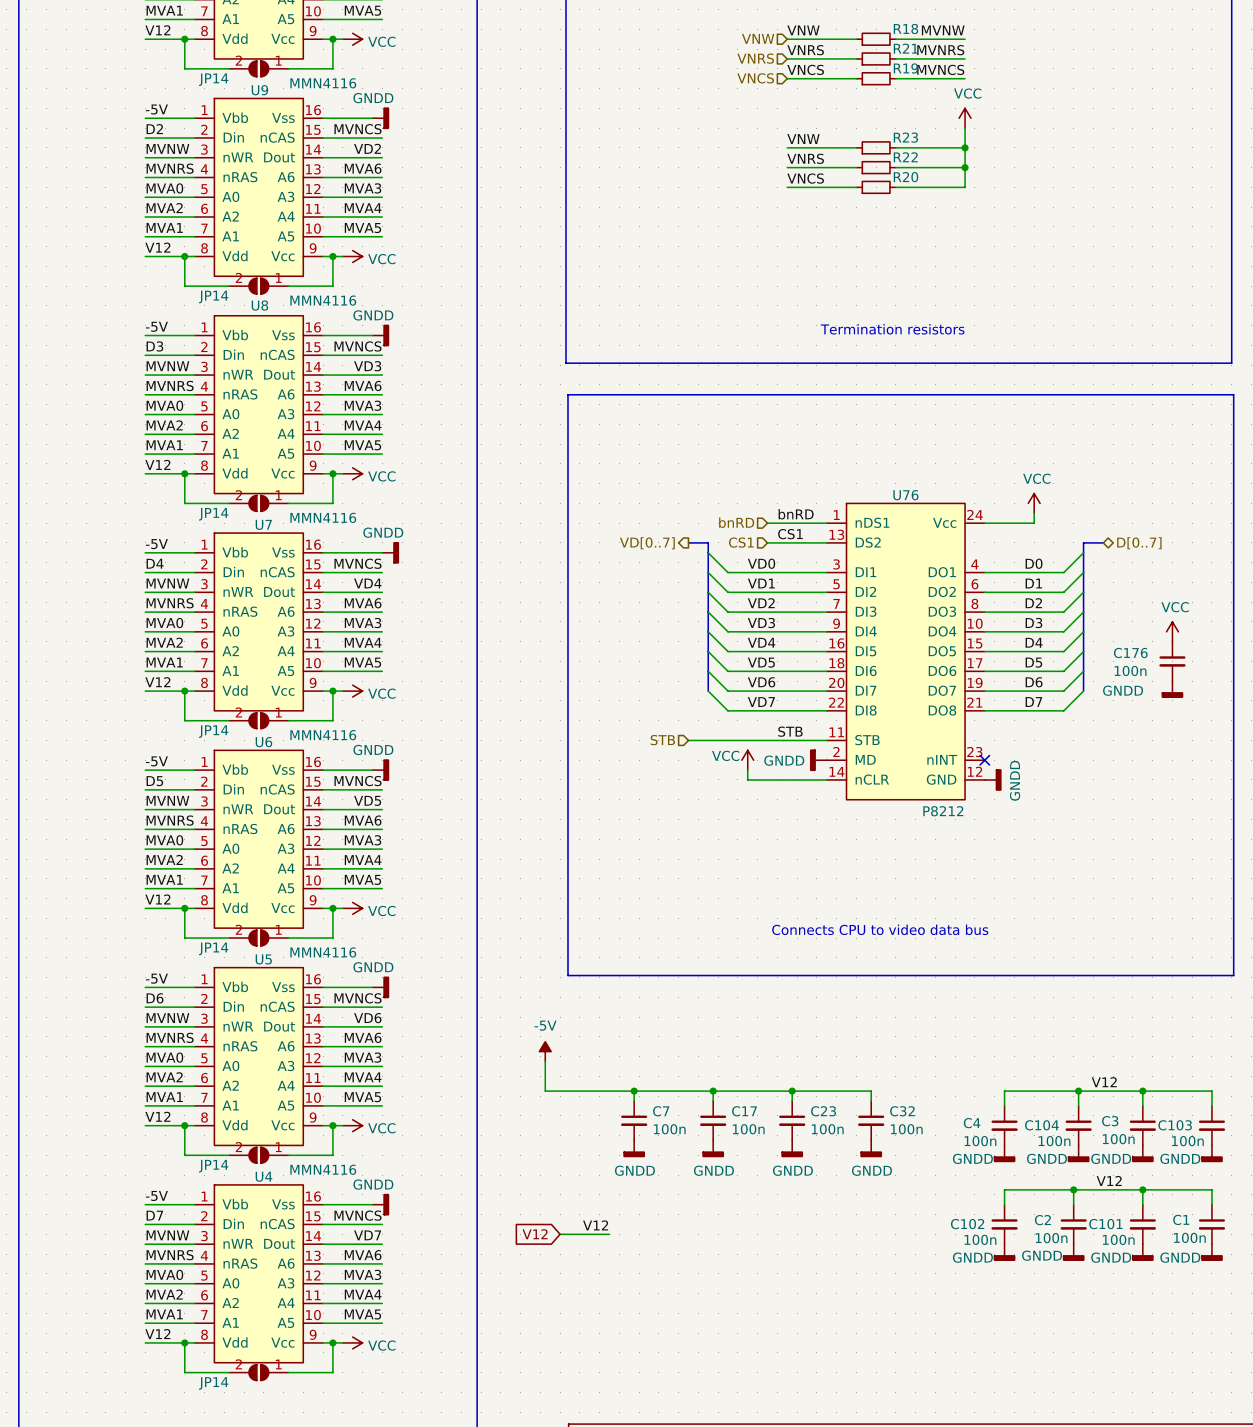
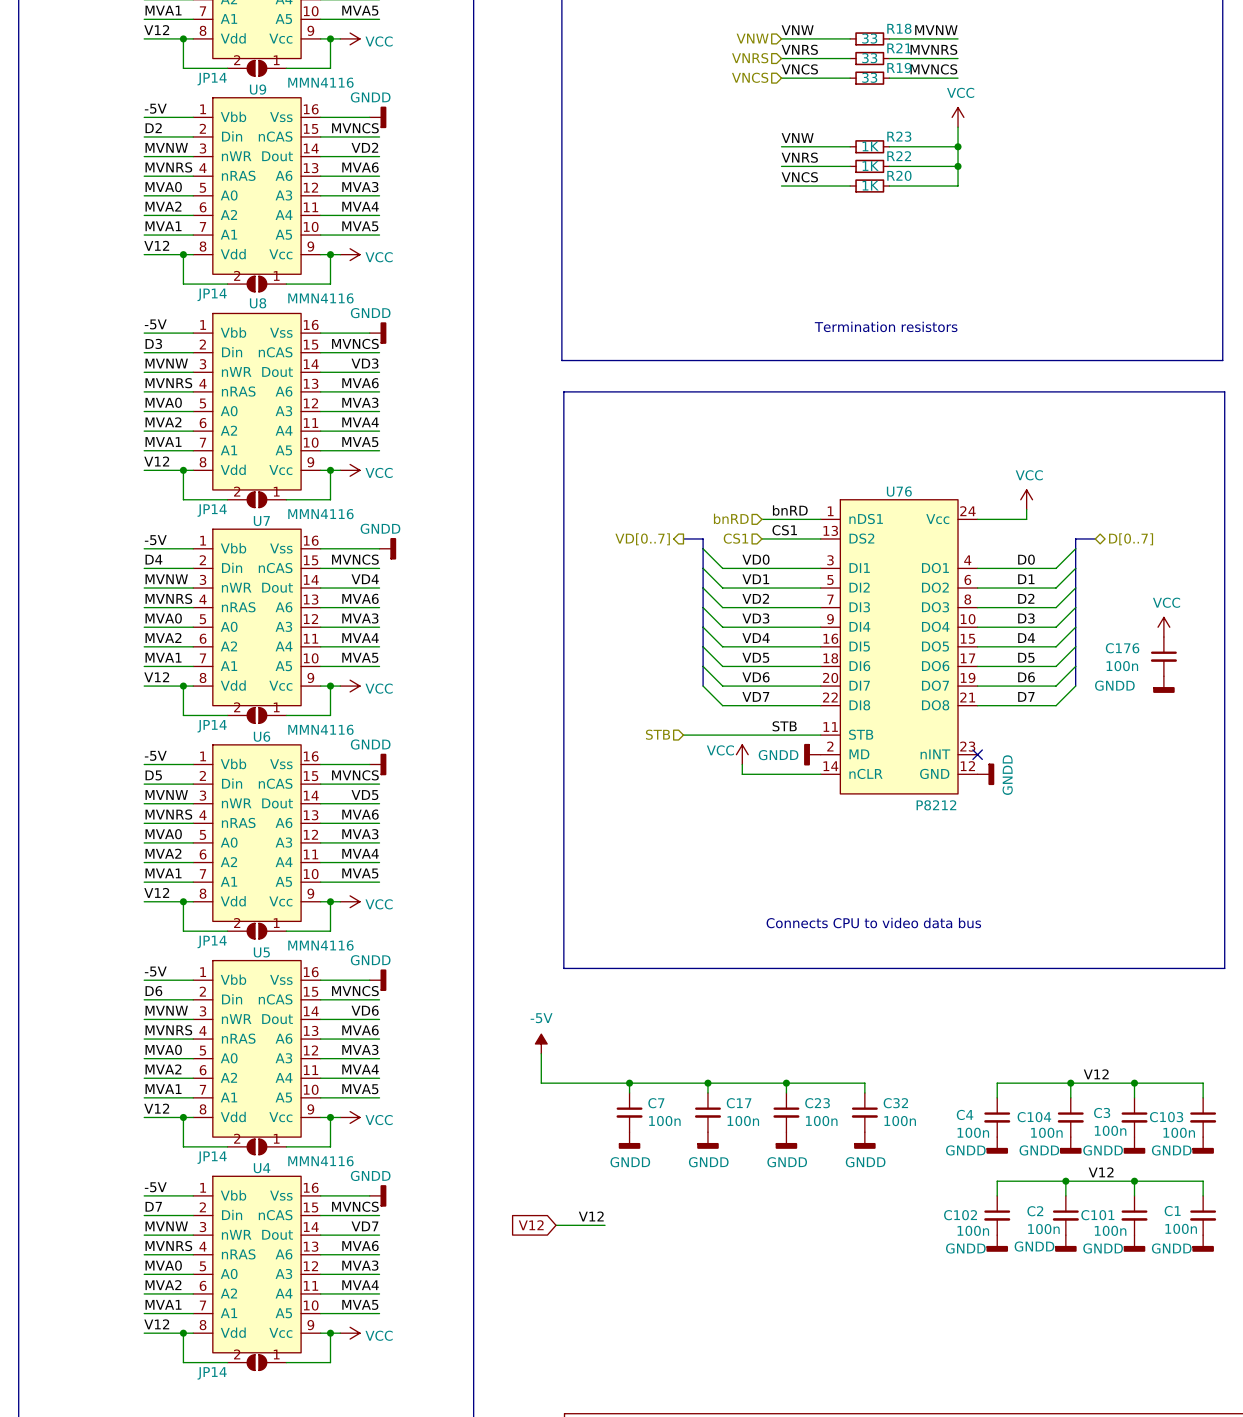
R18 value: none -> 33 (869, 38)
R21 value: none -> 33 (869, 58)
R19 value: none -> 33 (869, 77)
R23 value: none -> 1K (870, 146)
R22 value: none -> 1K (870, 166)
R20 value: none -> 1K (870, 185)

